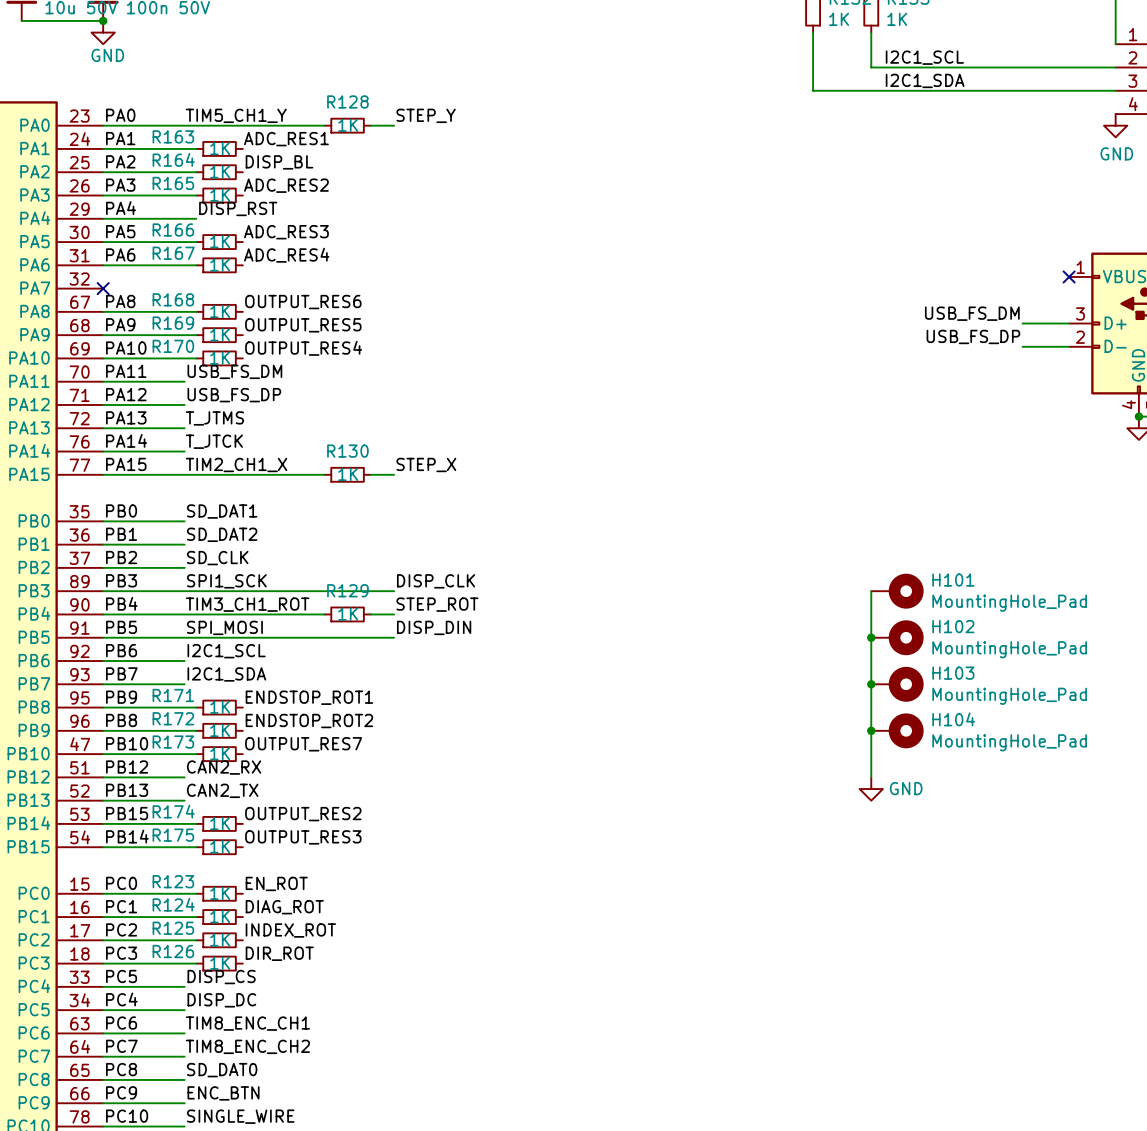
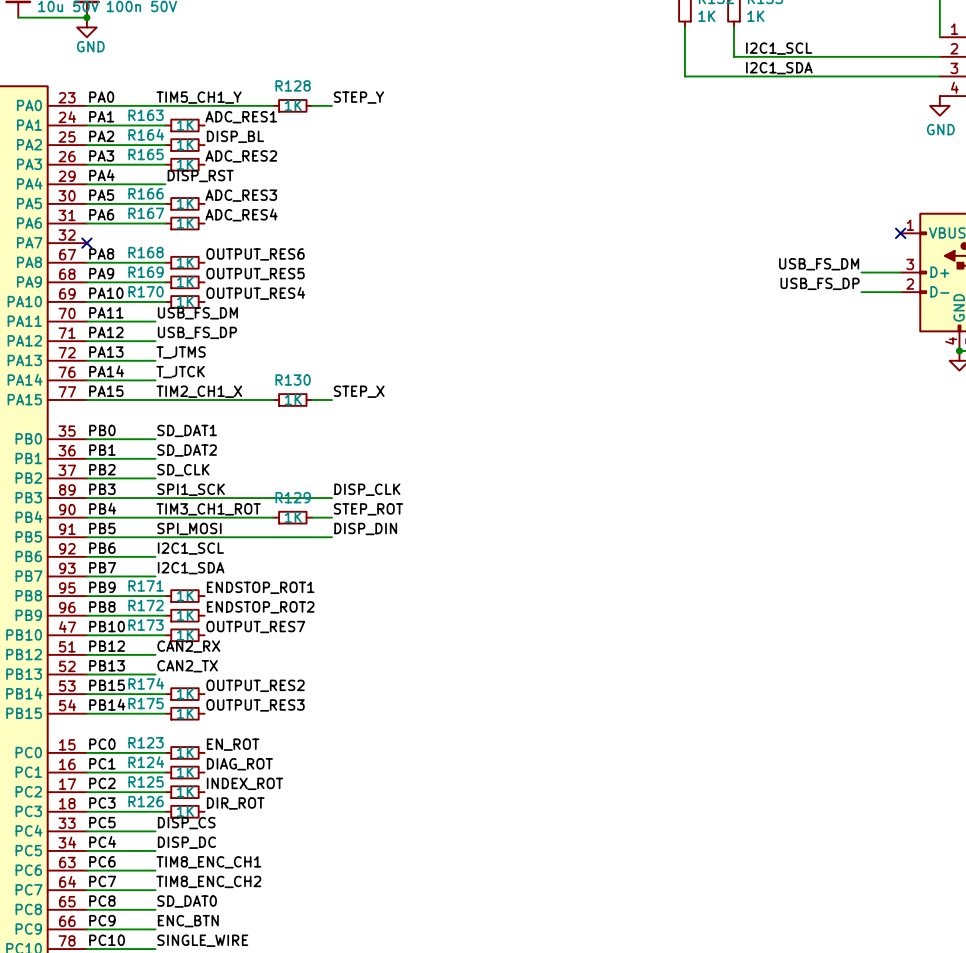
wire: (871, 591) (871, 777) -> none
H101: MountingHole_Pad (897, 591) -> none
junction: (871, 637) -> none
H102: MountingHole_Pad (897, 637) -> none
junction: (871, 684) -> none
H103: MountingHole_Pad (897, 684) -> none
junction: (871, 730) -> none
H104: MountingHole_Pad (897, 730) -> none
power symbol: GND (871, 789) -> none

